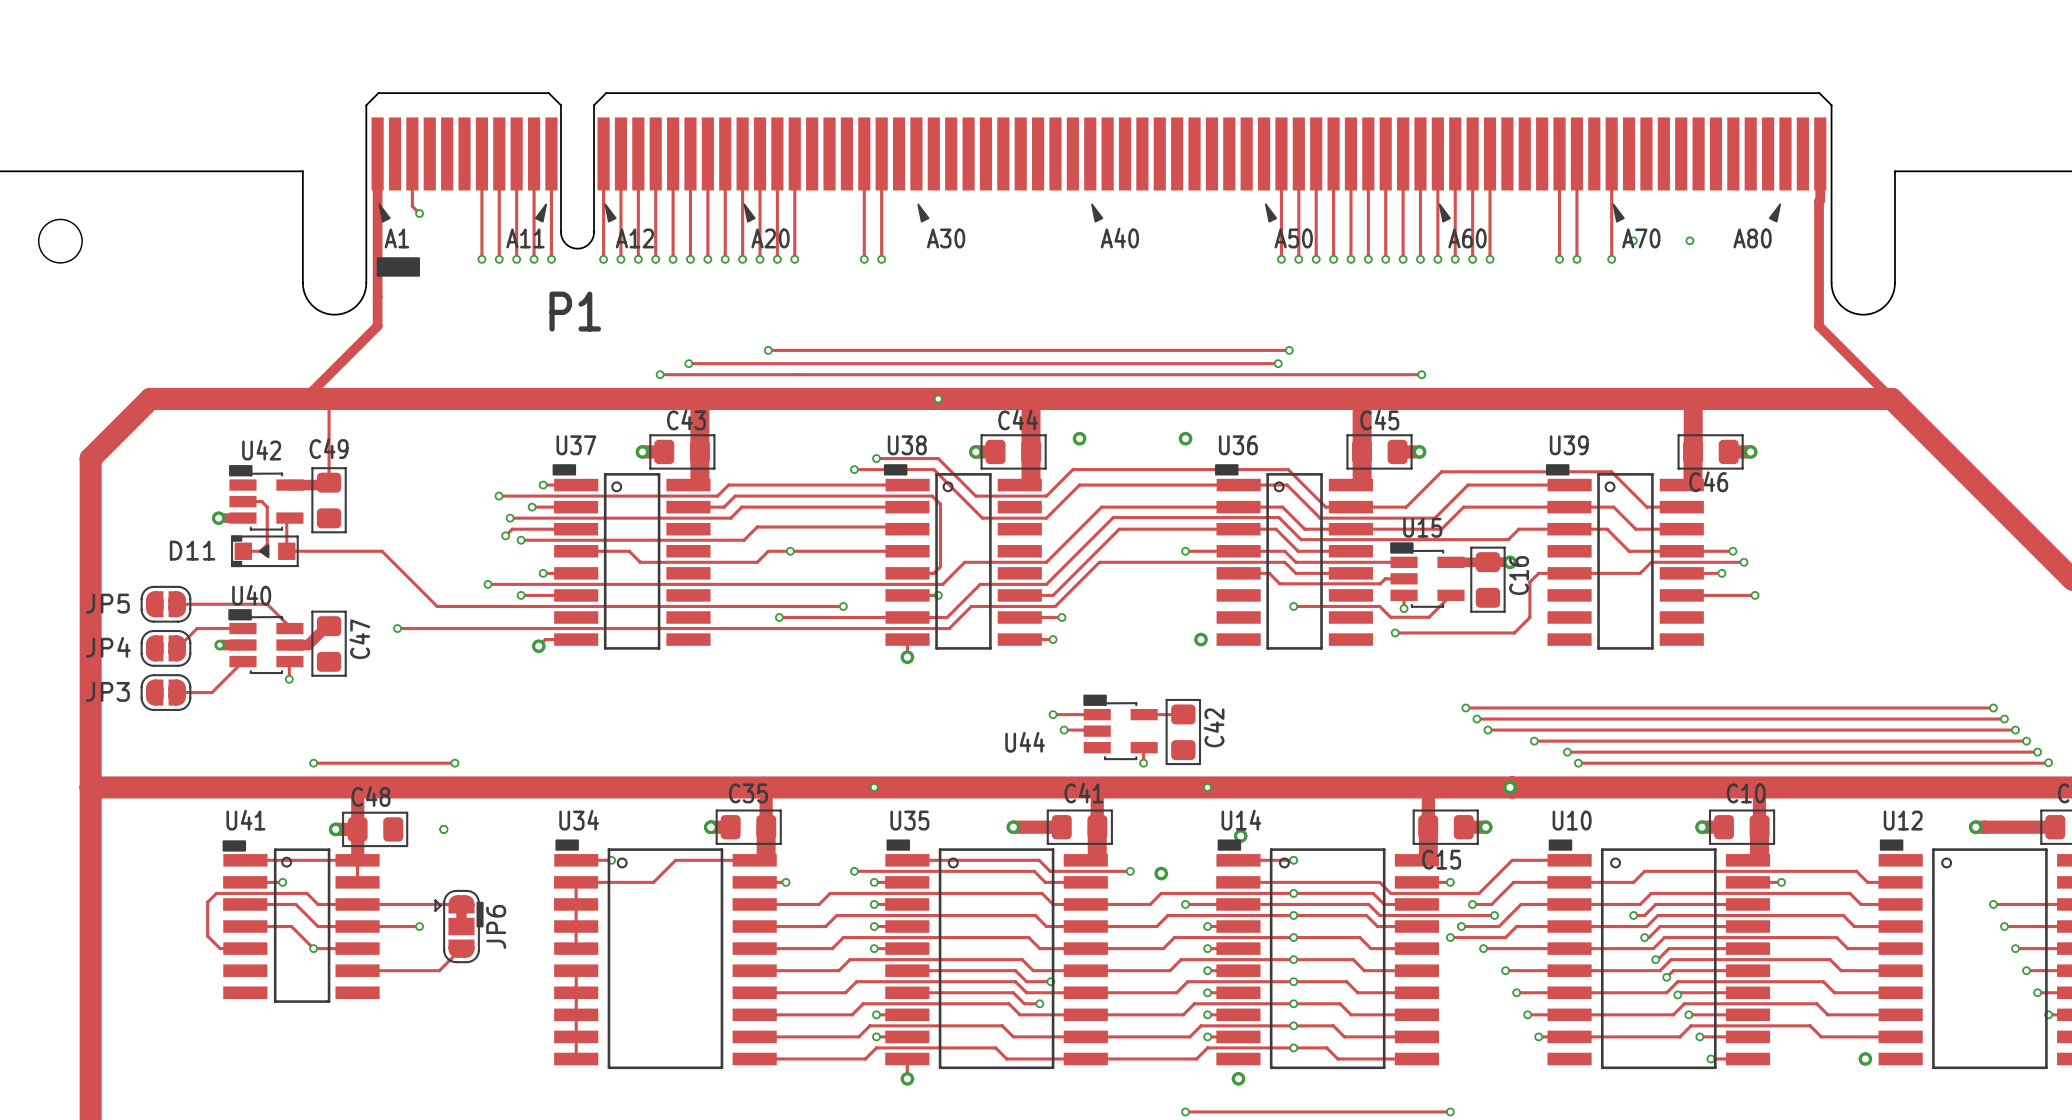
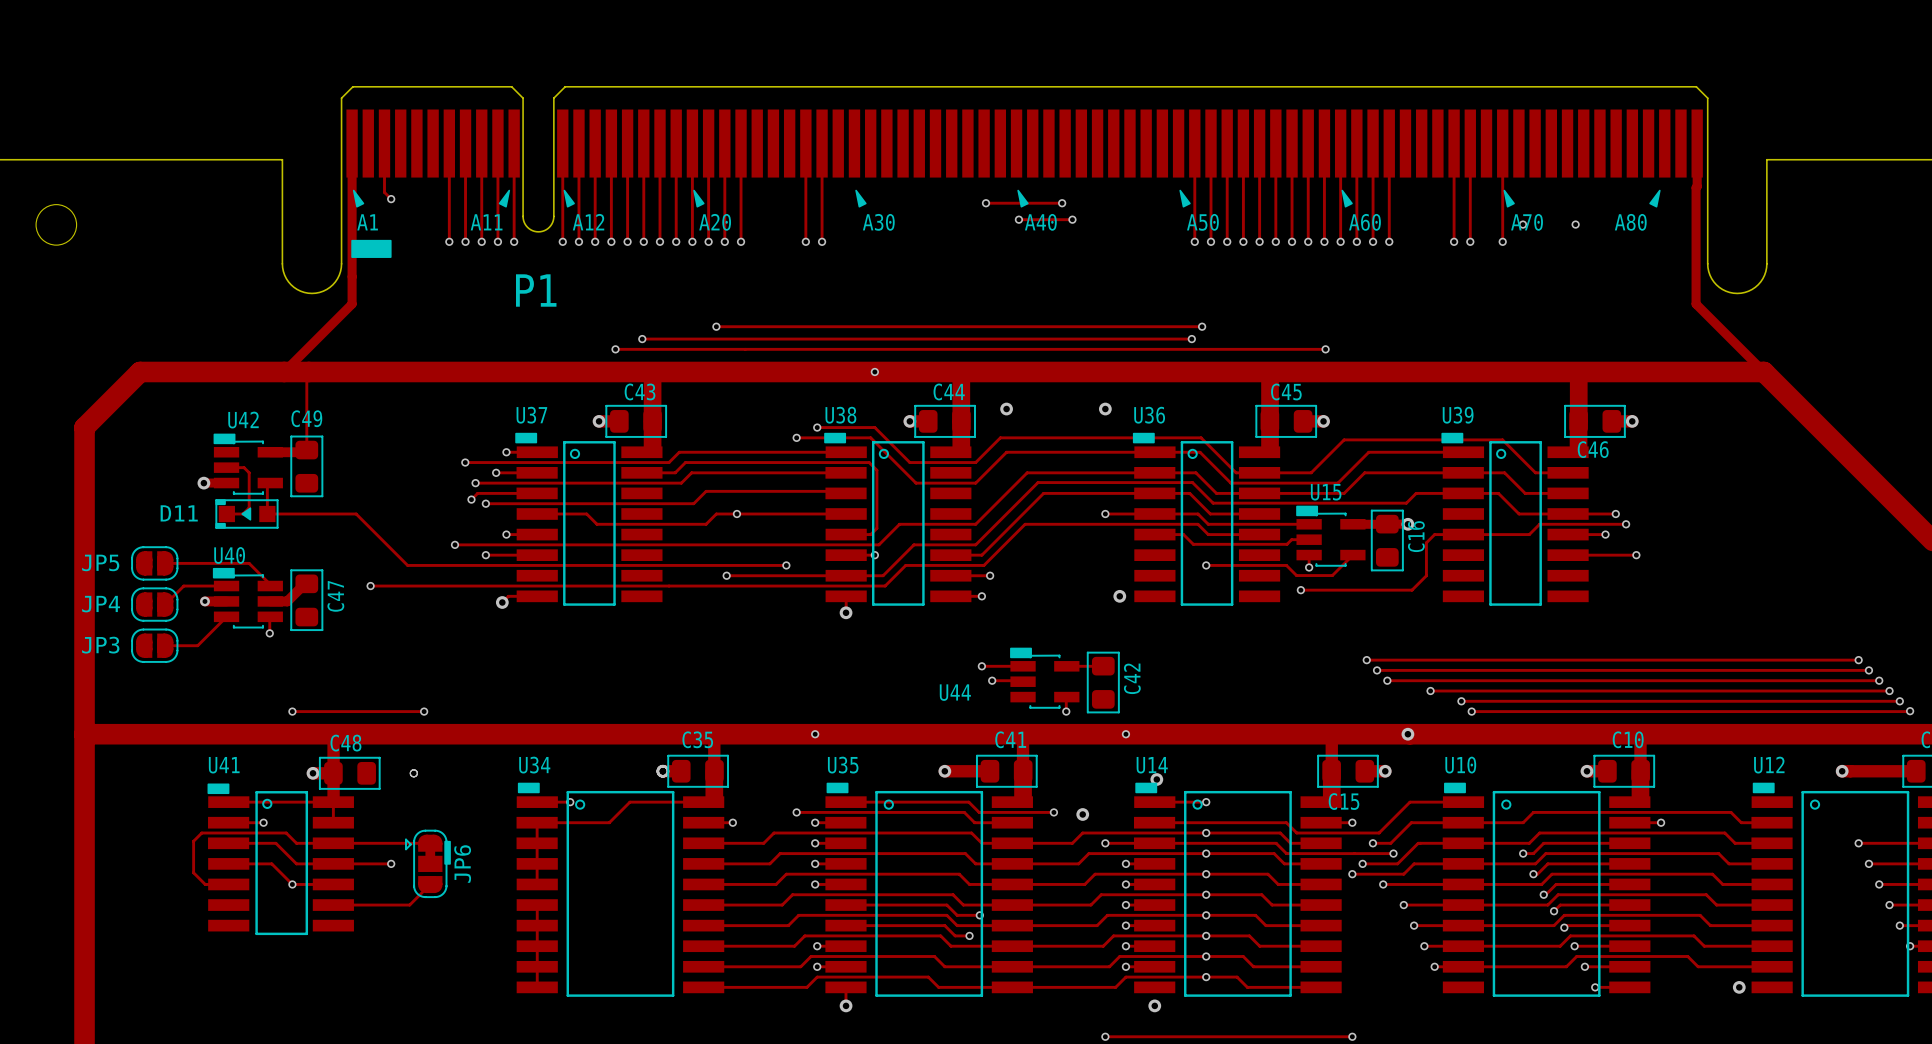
track: none -> (986, 203) (1062, 203)
via: none -> (986, 203)
via: none -> (1062, 203)
track: none -> (1018, 219) (1072, 219)
via: none -> (1018, 219)
via: none -> (1072, 219)

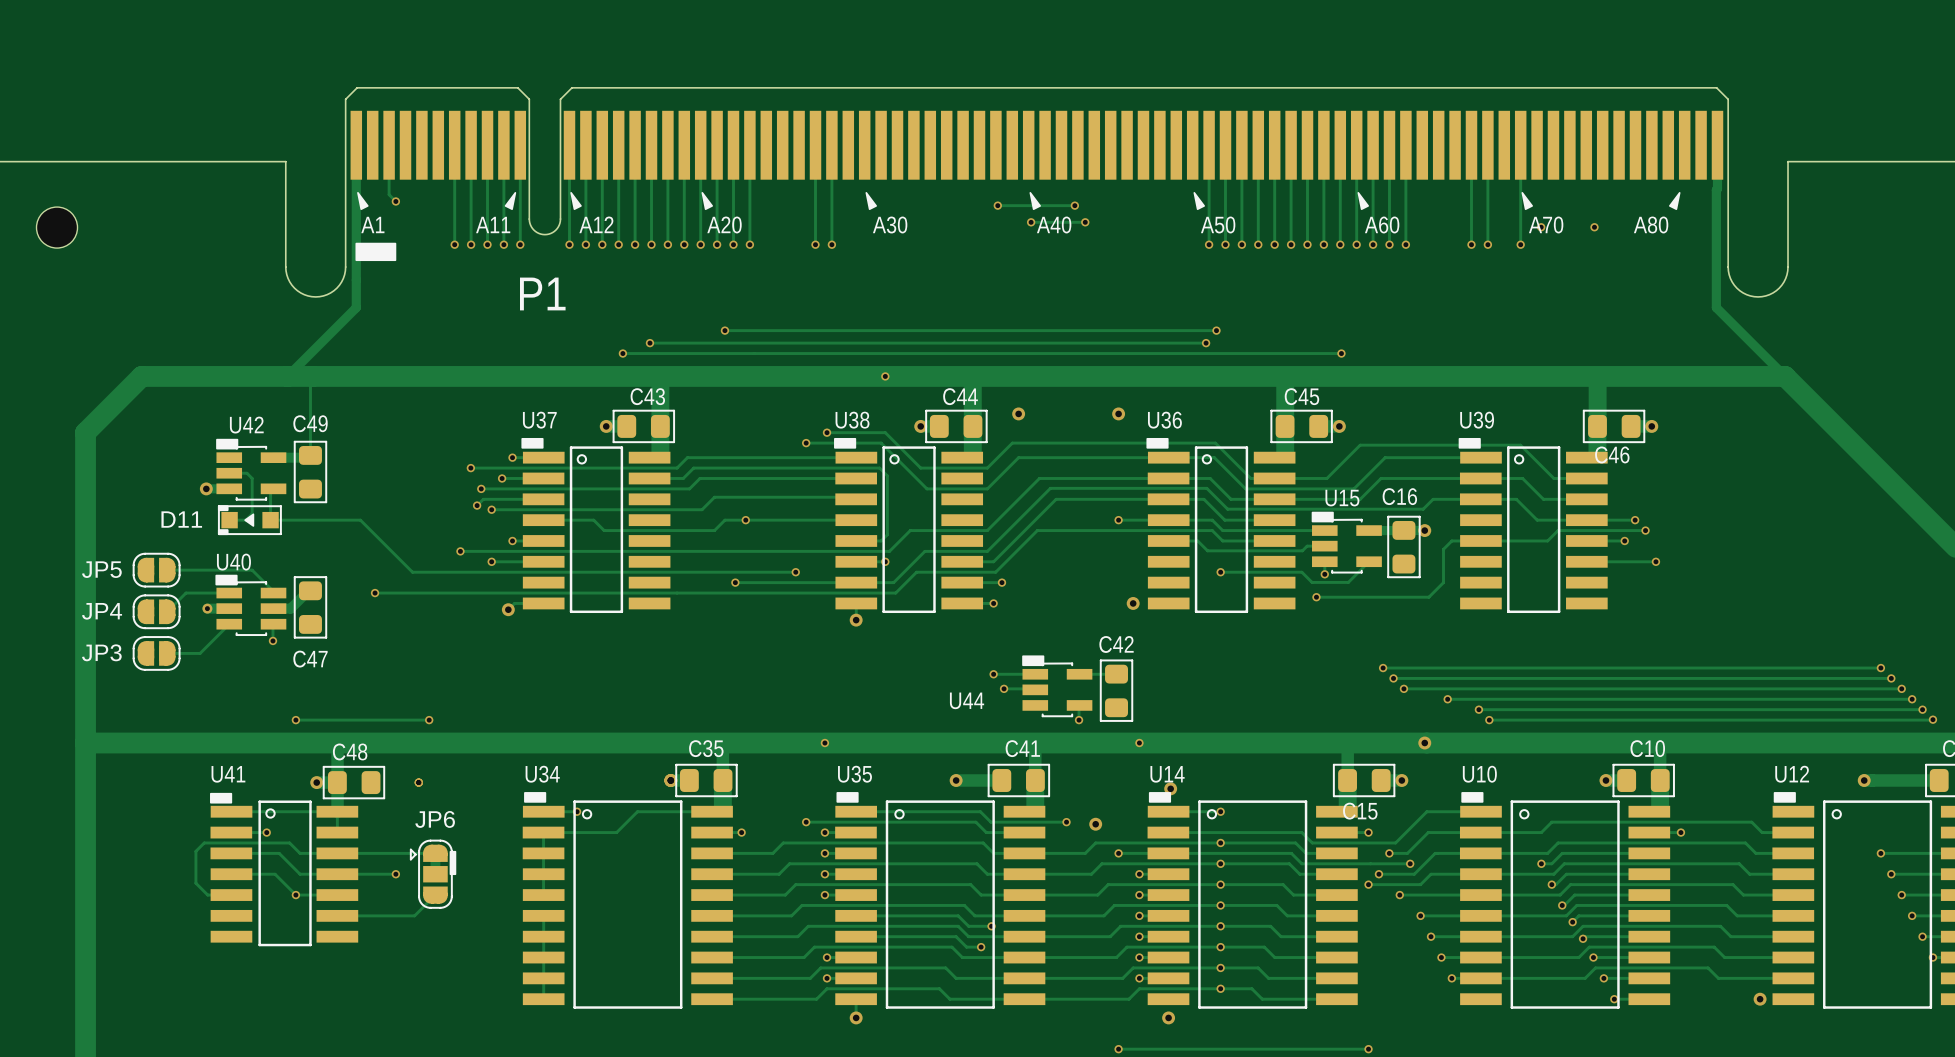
C16 name rotation: 0° (1416, 536) -> 90° clockwise (1399, 496)
C16 name position: C16 (1416, 536) -> C16 (1399, 496)
C47 name rotation: 0° (335, 596) -> 90° clockwise (310, 659)
C47 name position: C47 (335, 596) -> C47 (310, 659)
C42 name rotation: 0° (1132, 678) -> 90° clockwise (1116, 644)
C42 name position: C42 (1132, 678) -> C42 (1116, 644)
JP6 name rotation: 0° (462, 864) -> 90° clockwise (435, 819)
JP6 name position: JP6 (462, 864) -> JP6 (435, 819)

